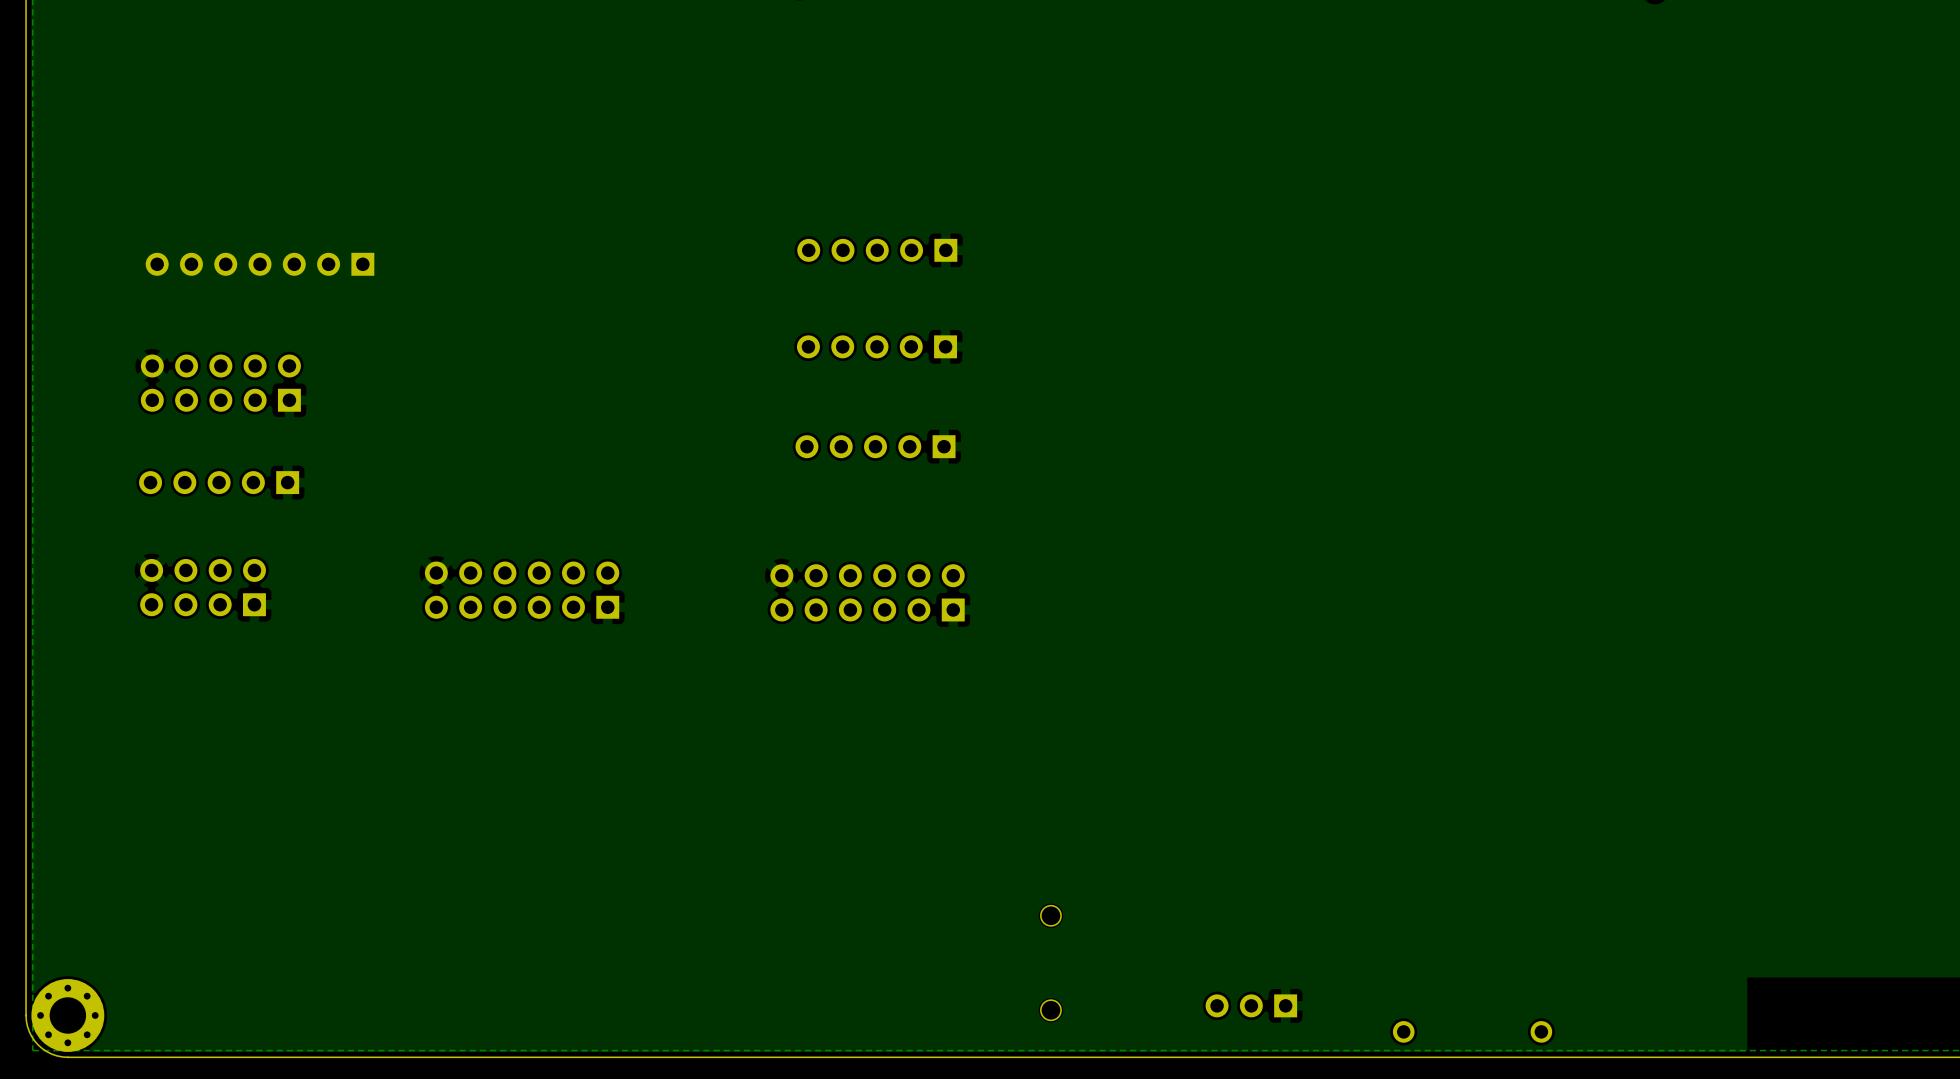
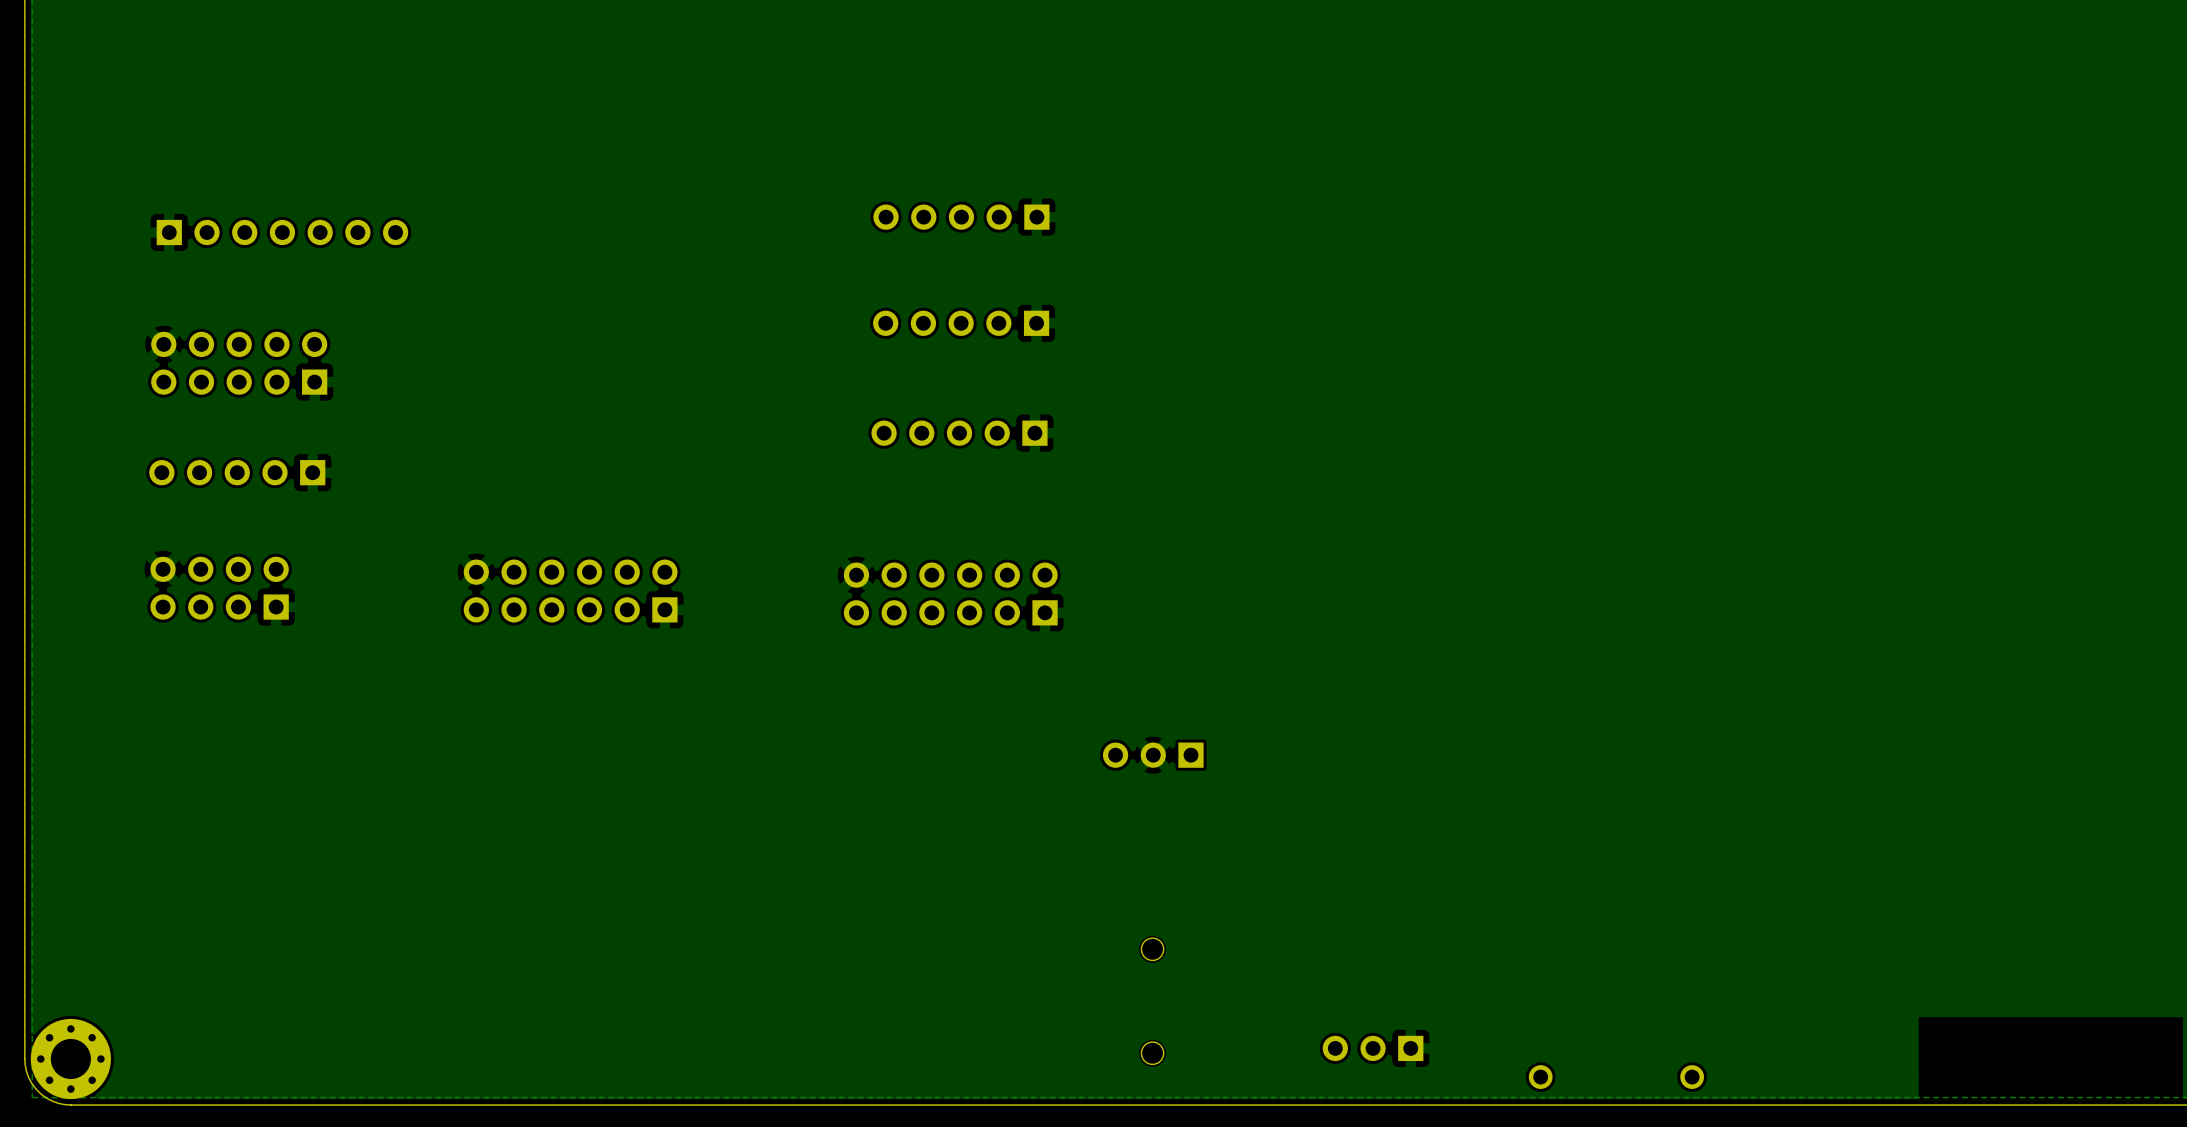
part rotation: 0° (260, 264) -> 180° (282, 232)
part: none -> (1153, 755)

